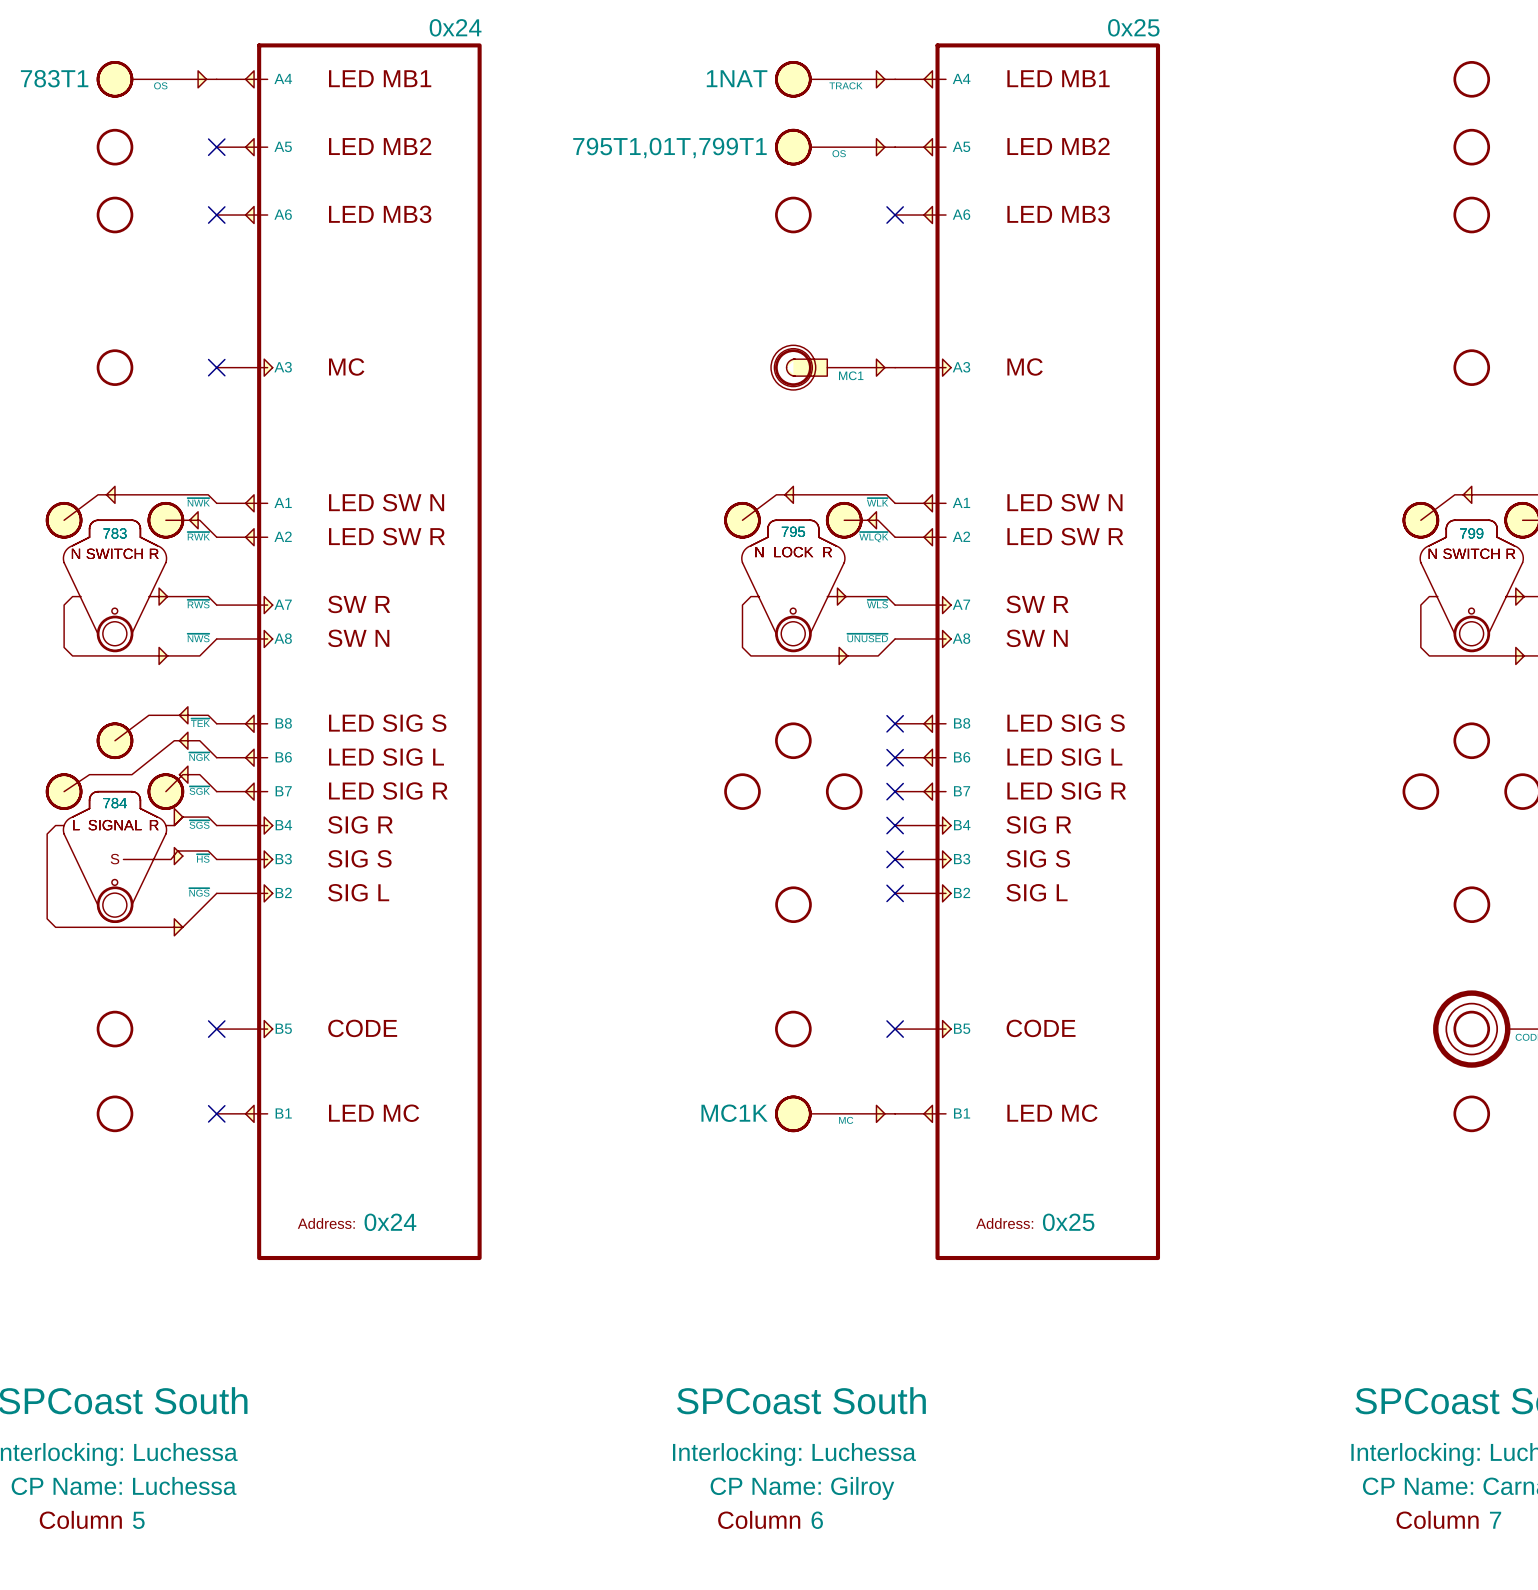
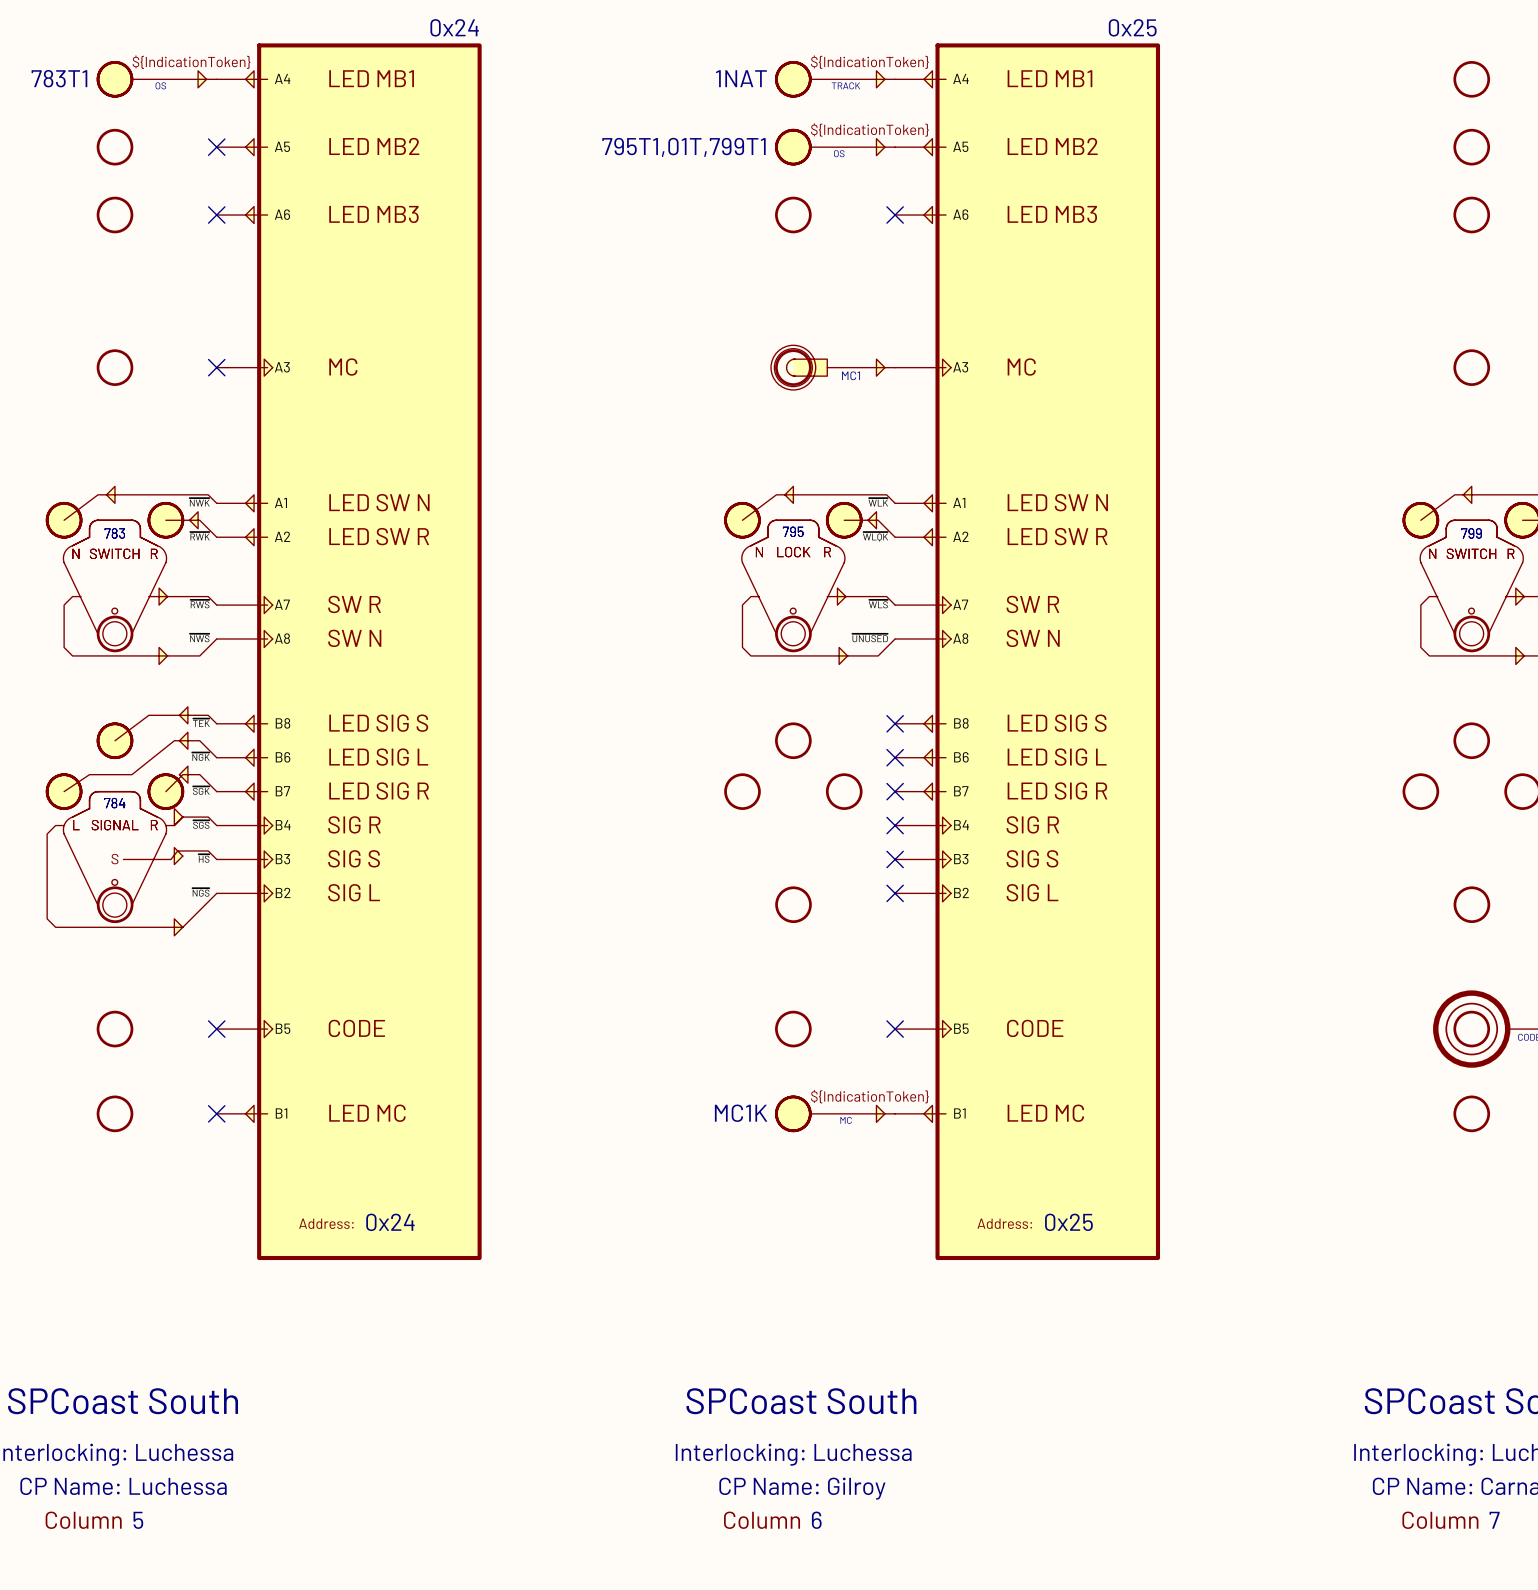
part symbol: [216, 43, 482, 1261] -> [216, 43, 482, 1261]
part symbol: [895, 43, 1161, 1261] -> [895, 43, 1161, 1261]
part text: none -> ${IndicationToken} (191, 62)
part text: none -> ${IndicationToken} (869, 62)
part text: none -> ${IndicationToken} (869, 129)
part text: none -> ${IndicationToken} (869, 1096)

